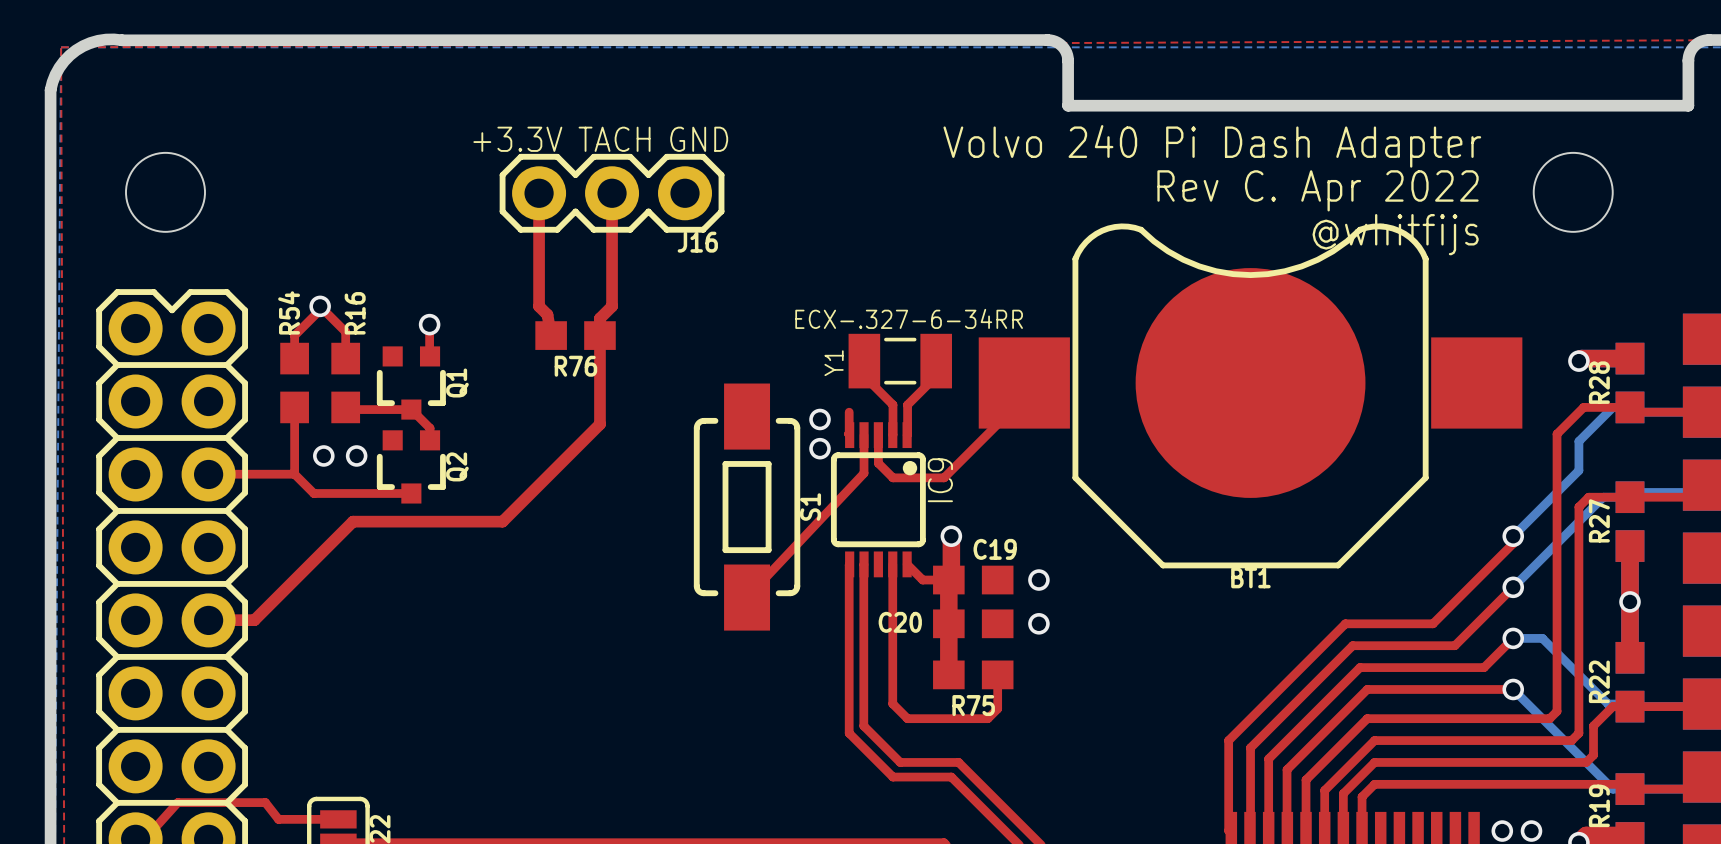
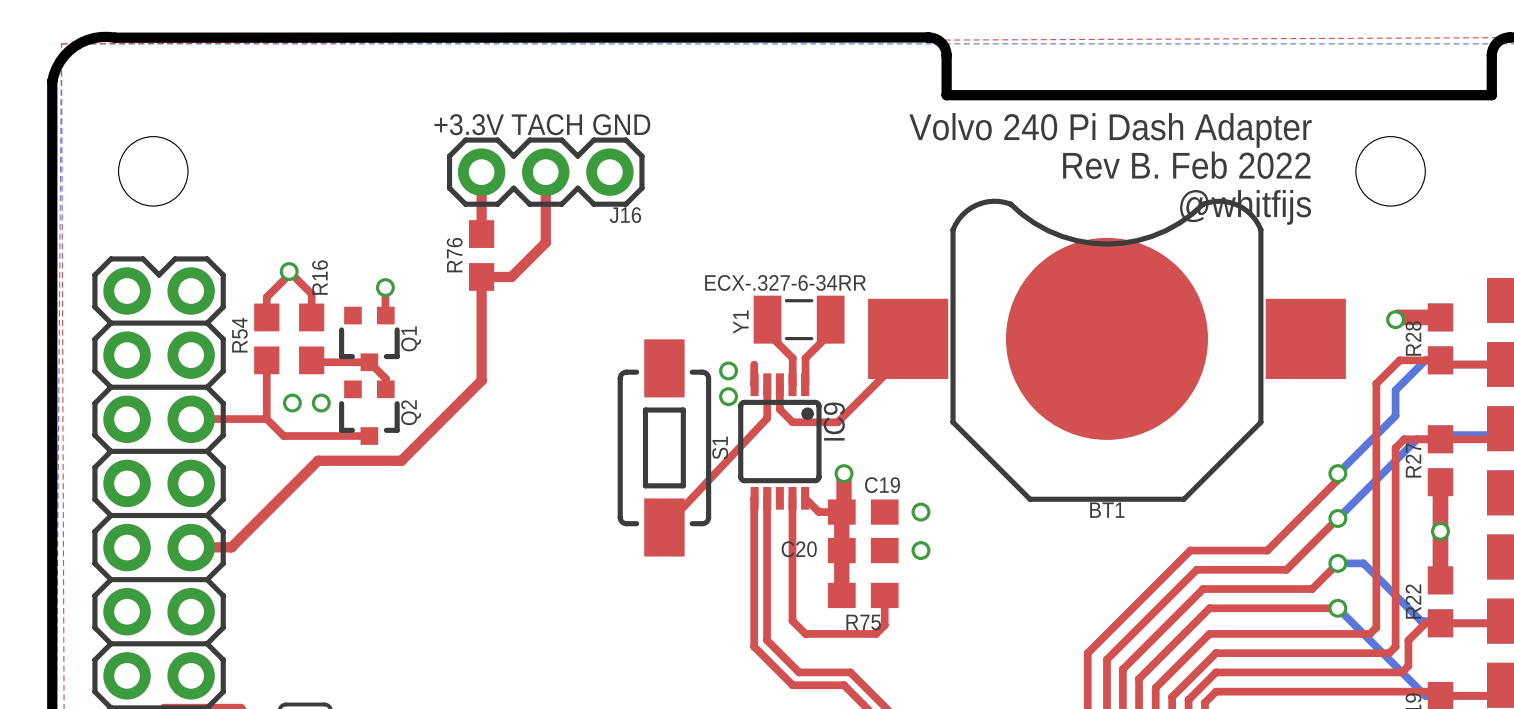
text: Rev C. Apr 2022 (1318, 190) -> Rev B. Feb 2022 (1186, 165)
top track: (539, 263) (539, 306) (547, 314) (551, 335) -> none
top track: (612, 273) (612, 306) (599, 318) (599, 424) (502, 521) (447, 521) -> (545, 242) (511, 276) (481, 276) (481, 380) (401, 460)
R54 name position: R54 (289, 312) -> R54 (239, 335)
R76 rotation: 0° (575, 335) -> 90° clockwise (481, 255)
R76 position: (575, 335) -> (481, 255)

